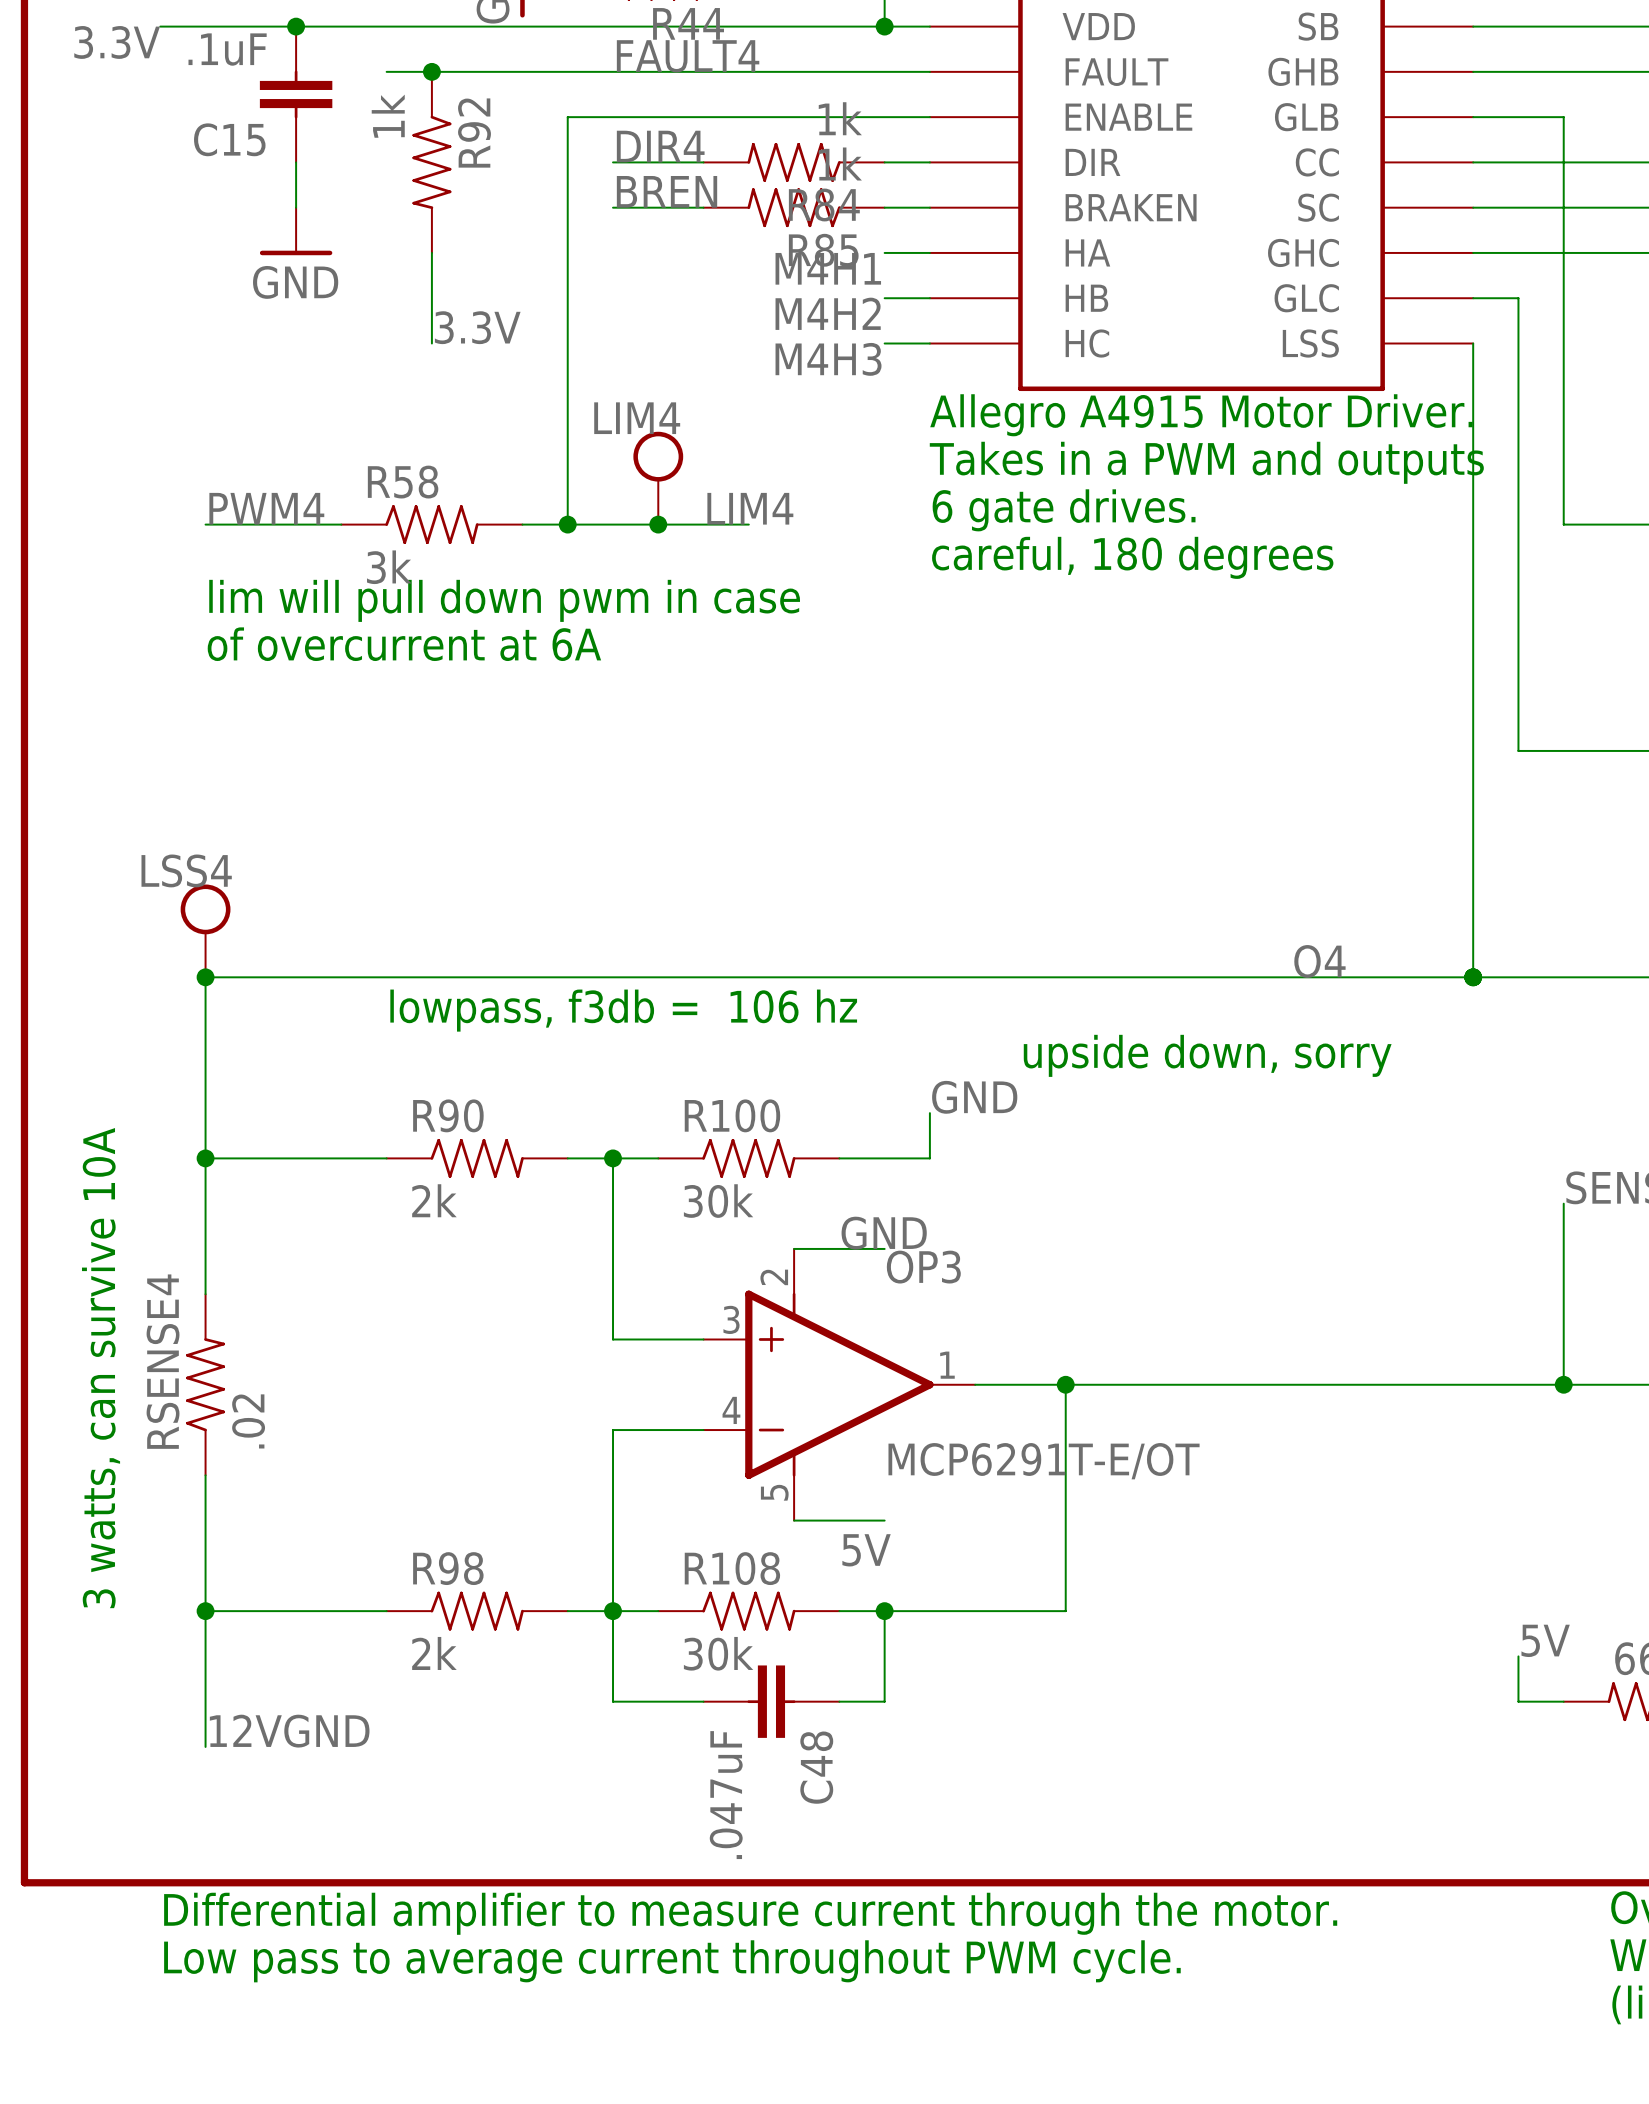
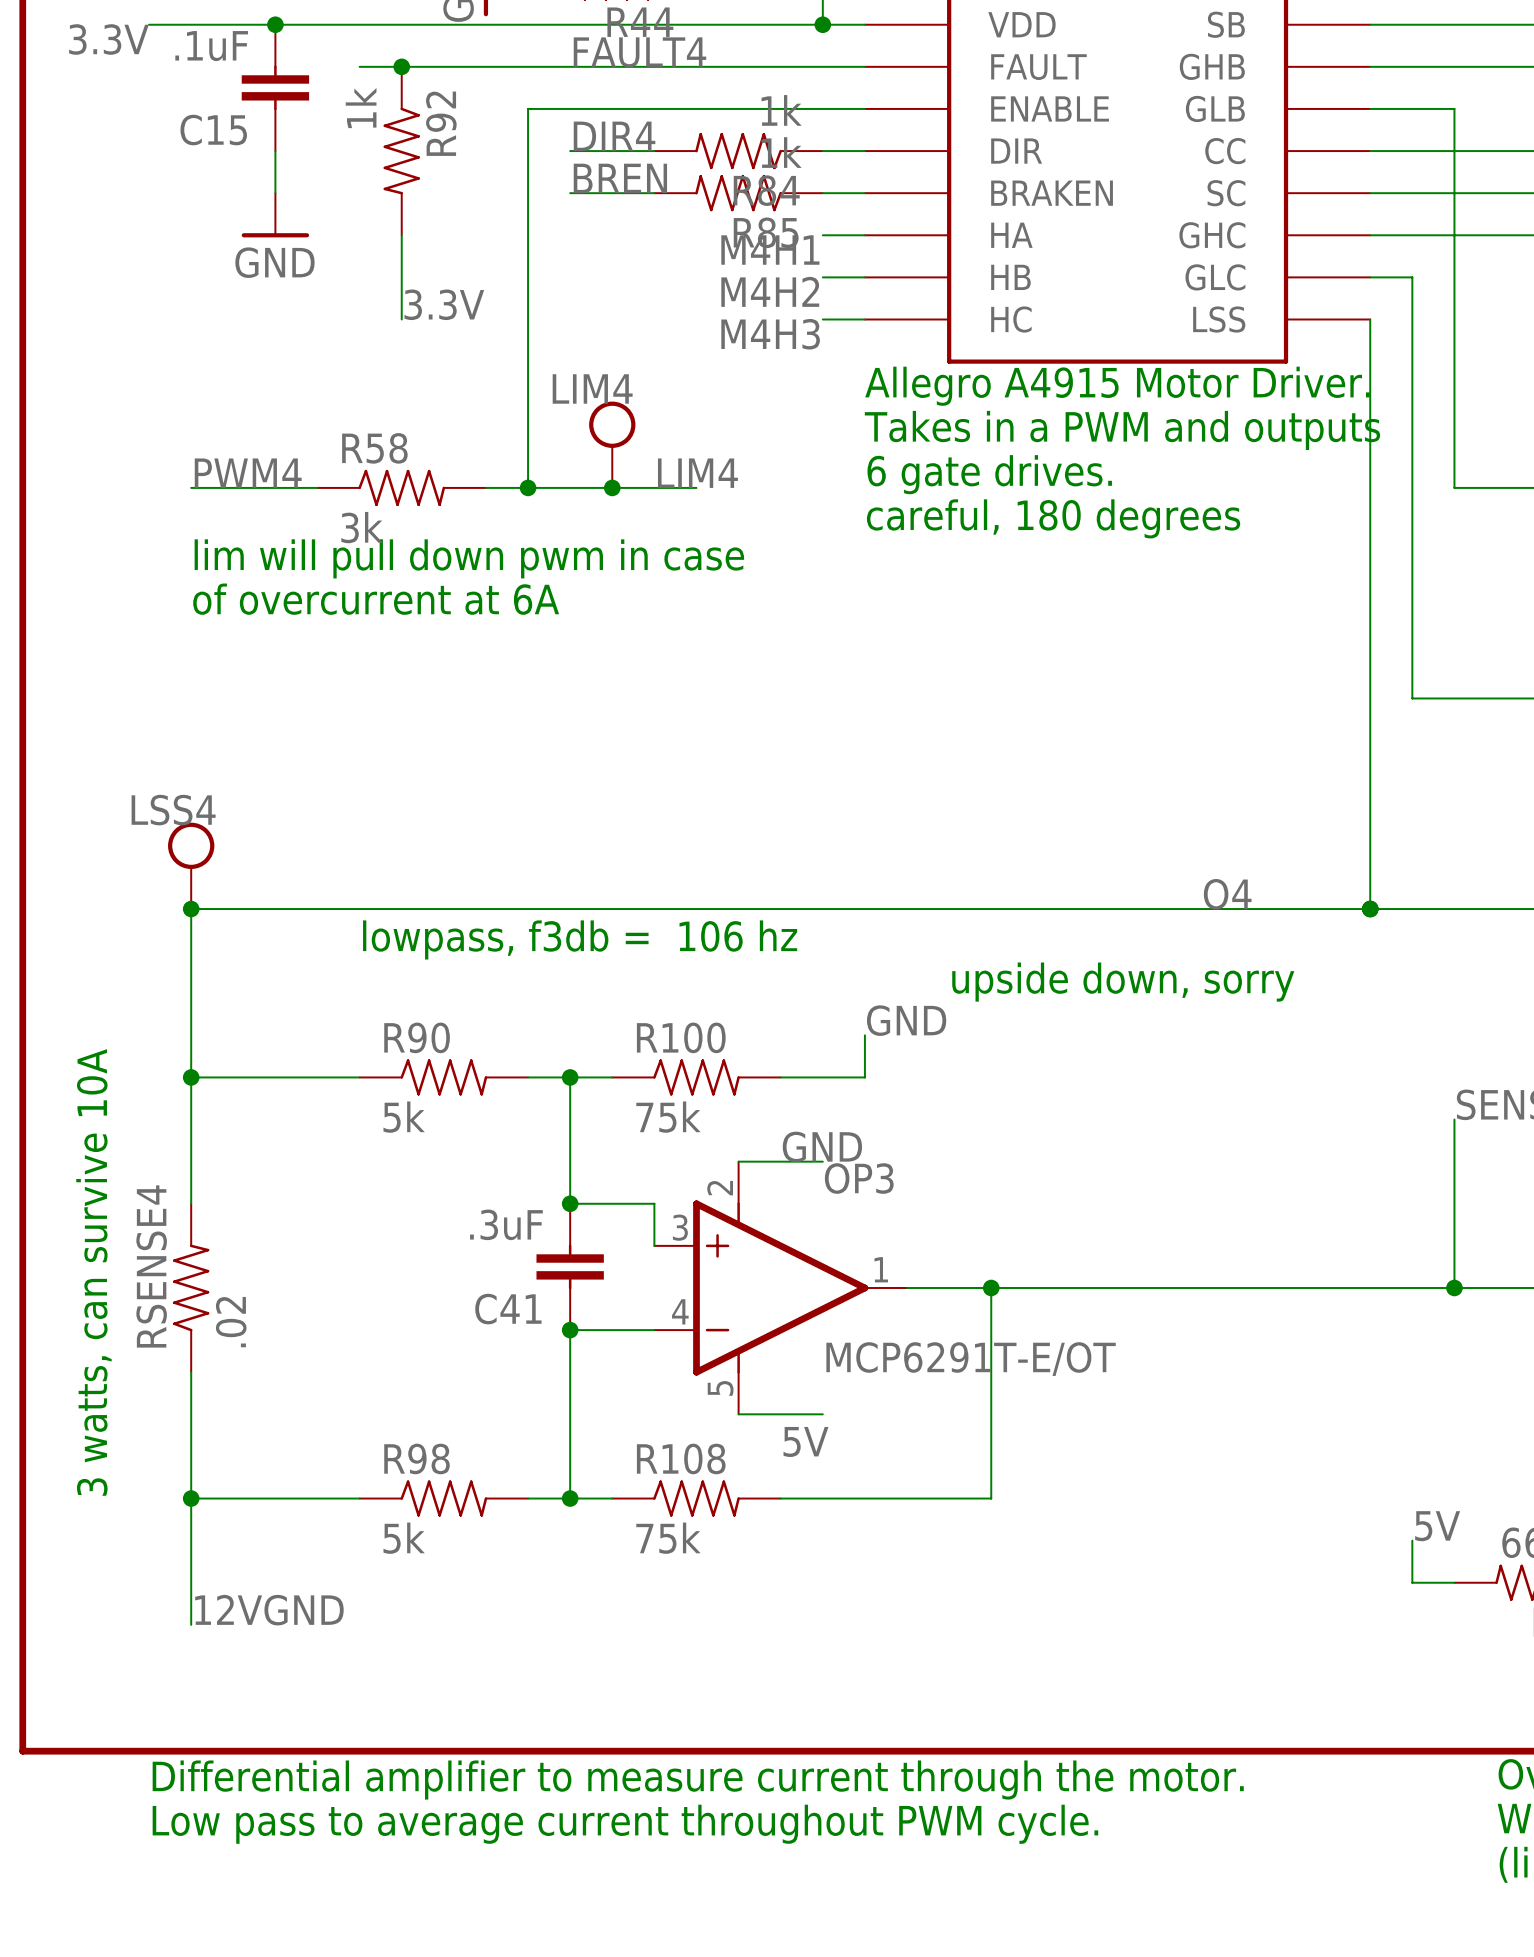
R90 value: 2k (434, 1200) -> 5k (404, 1117)
R100 value: 30k (718, 1201) -> 75k (668, 1117)
wire: (613, 1294) (613, 1339) (703, 1339) -> (570, 1203) (654, 1203) (654, 1245)
junction: none -> (570, 1203)
C41: none -> .3uF (570, 1266)
junction: none -> (570, 1330)
wire: (613, 1611) (613, 1701) (703, 1701) -> none
wire: (884, 1611) (884, 1701) (839, 1701) -> none
junction: (884, 1611) -> none
R98 value: 2k (434, 1653) -> 5k (404, 1538)
R108 value: 30k (718, 1653) -> 75k (668, 1538)
C48: .047uF (771, 1701) -> none

